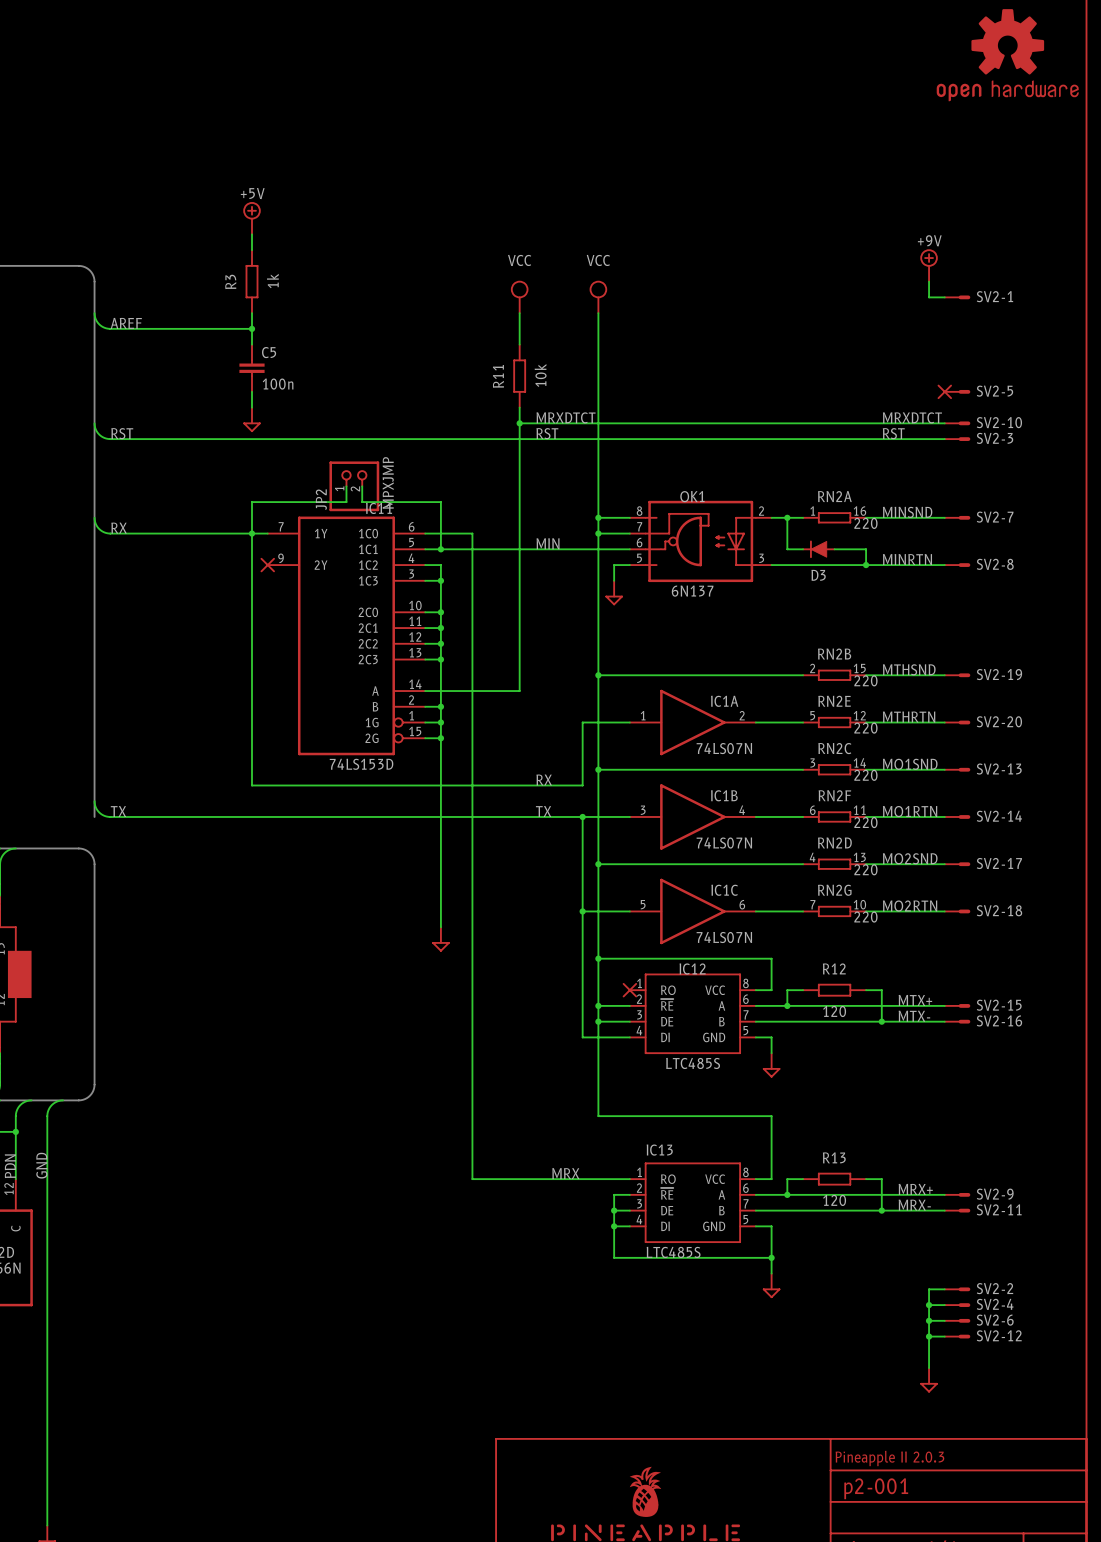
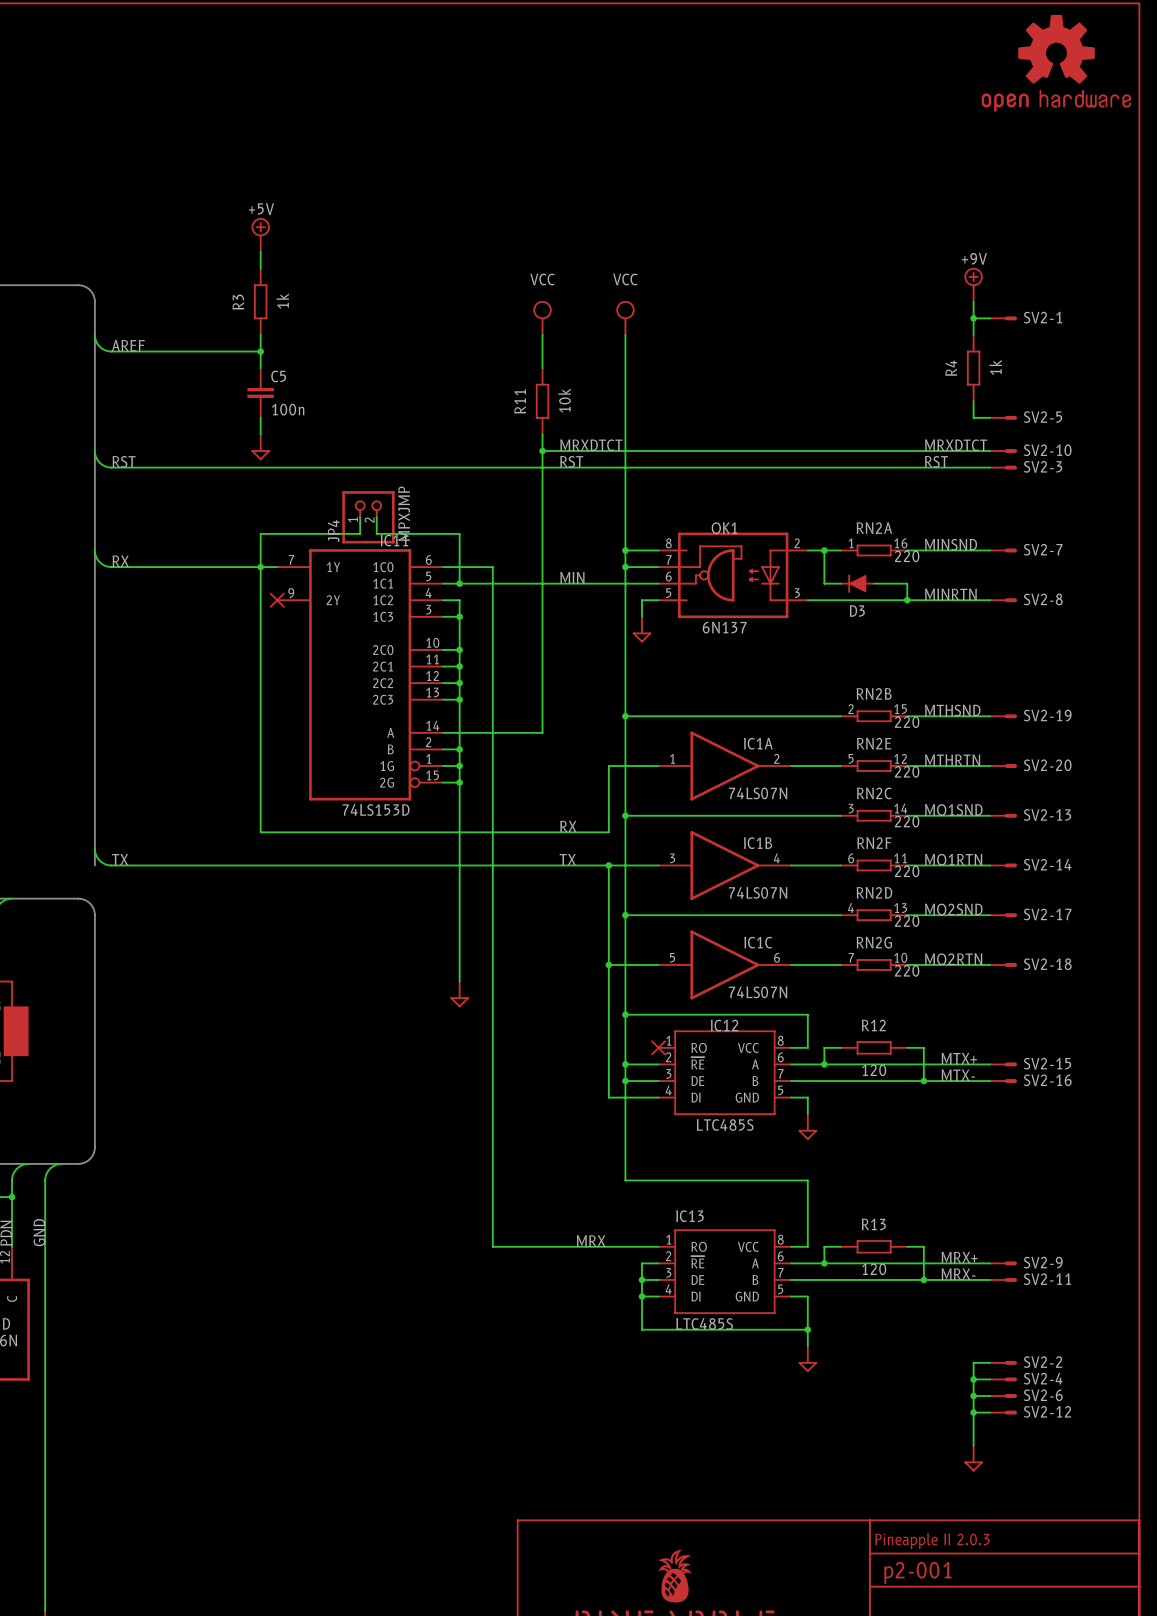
wire: none -> (973, 318) (973, 334)
junction: none -> (973, 318)
R4: none -> 1k (973, 368)
wire: none -> (973, 401) (973, 417) (990, 417)
part: (944, 391) -> none
JP2 name: JP2 (321, 499) -> JP4 (333, 531)

